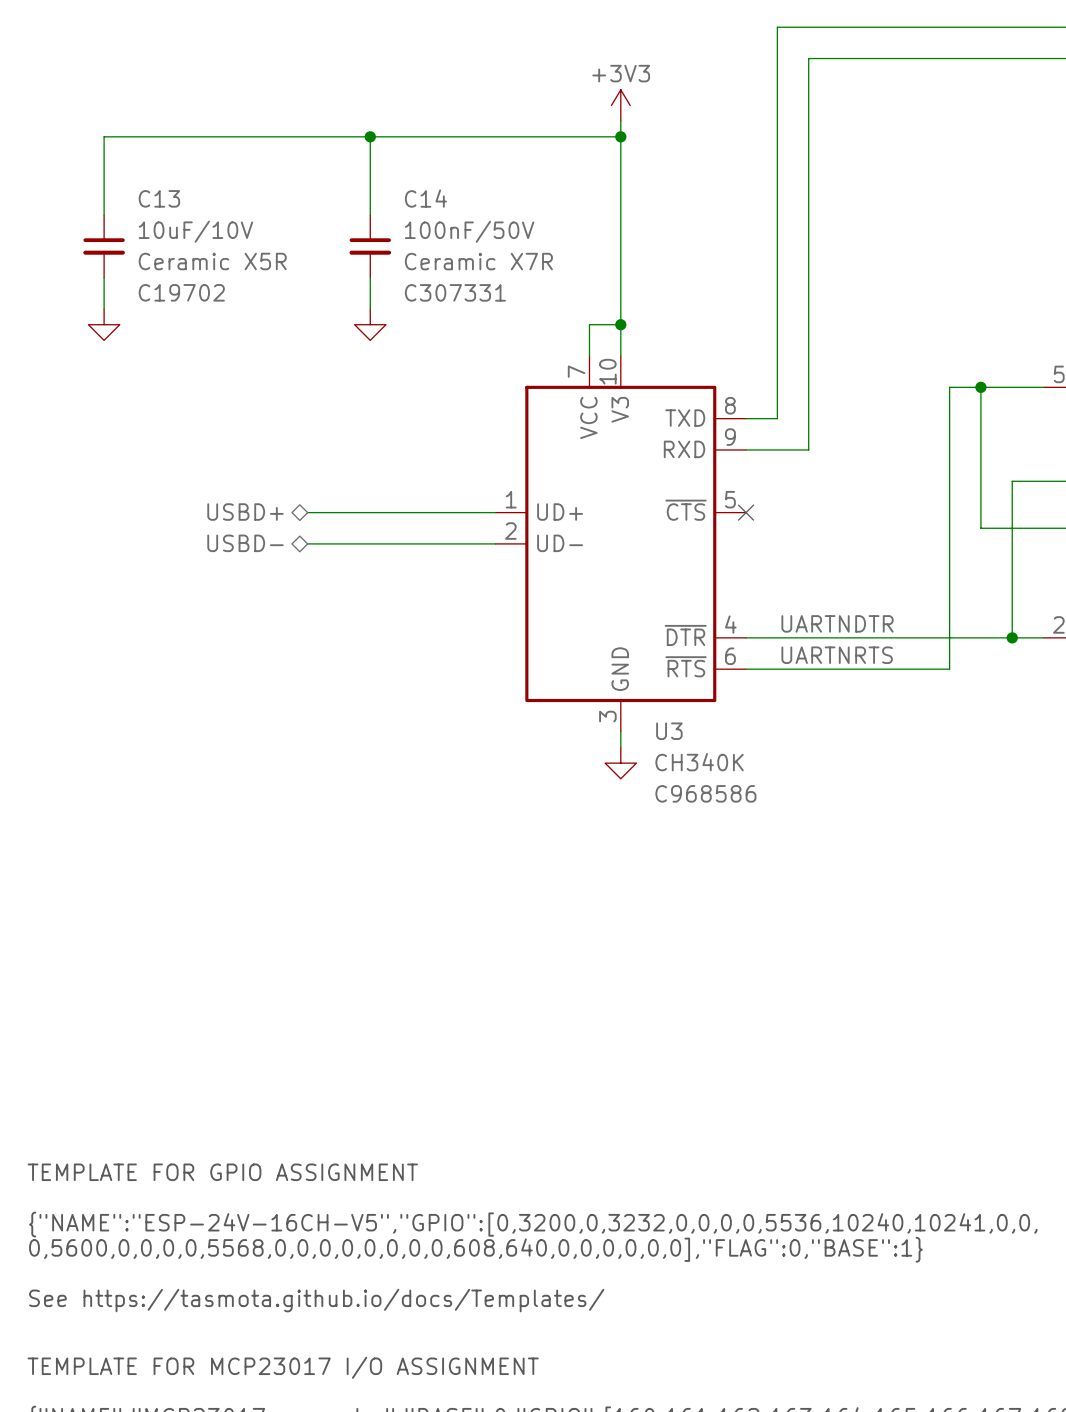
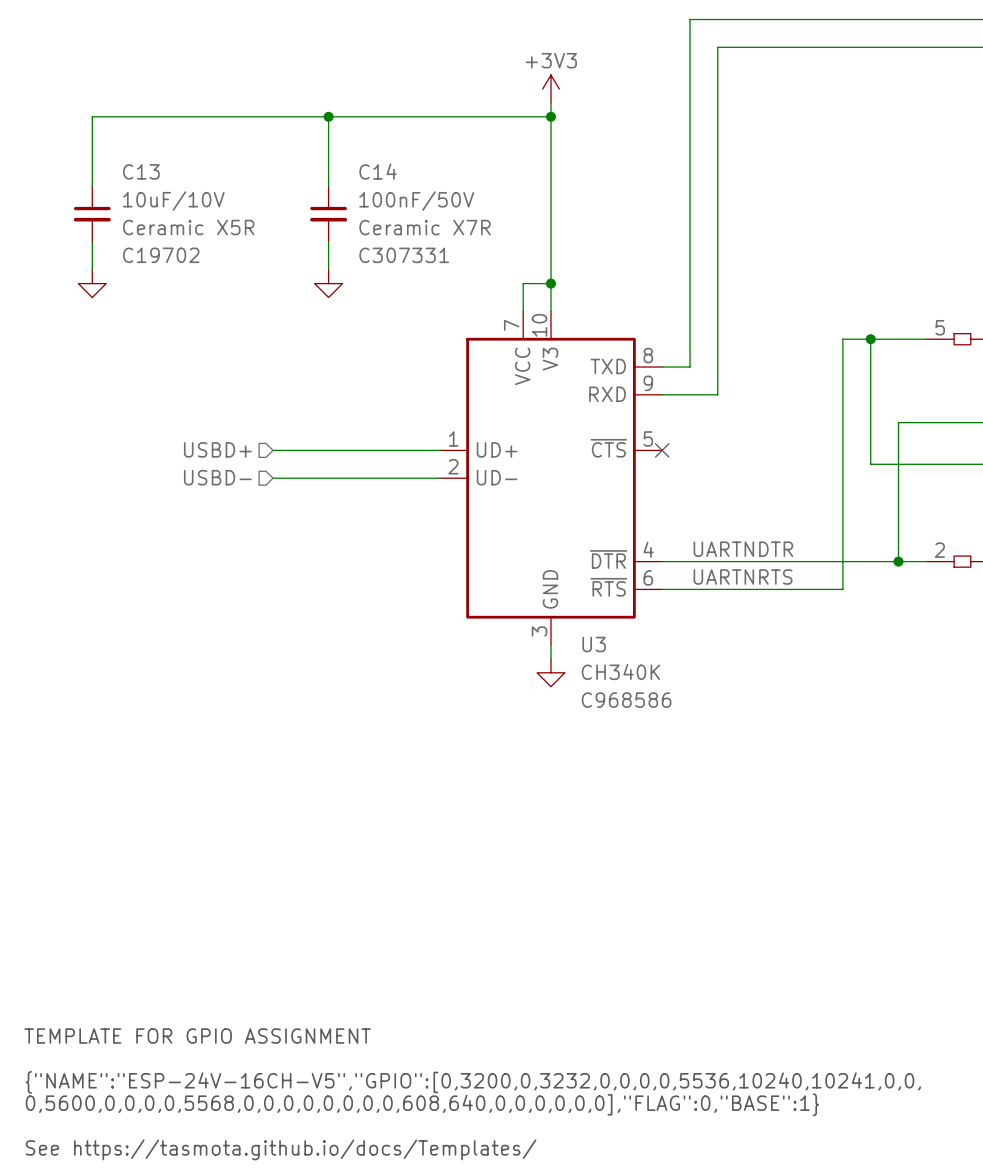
hierarchical label shape: bidirectional (245, 512) -> input (217, 449)
hierarchical label shape: bidirectional (245, 543) -> input (217, 477)

